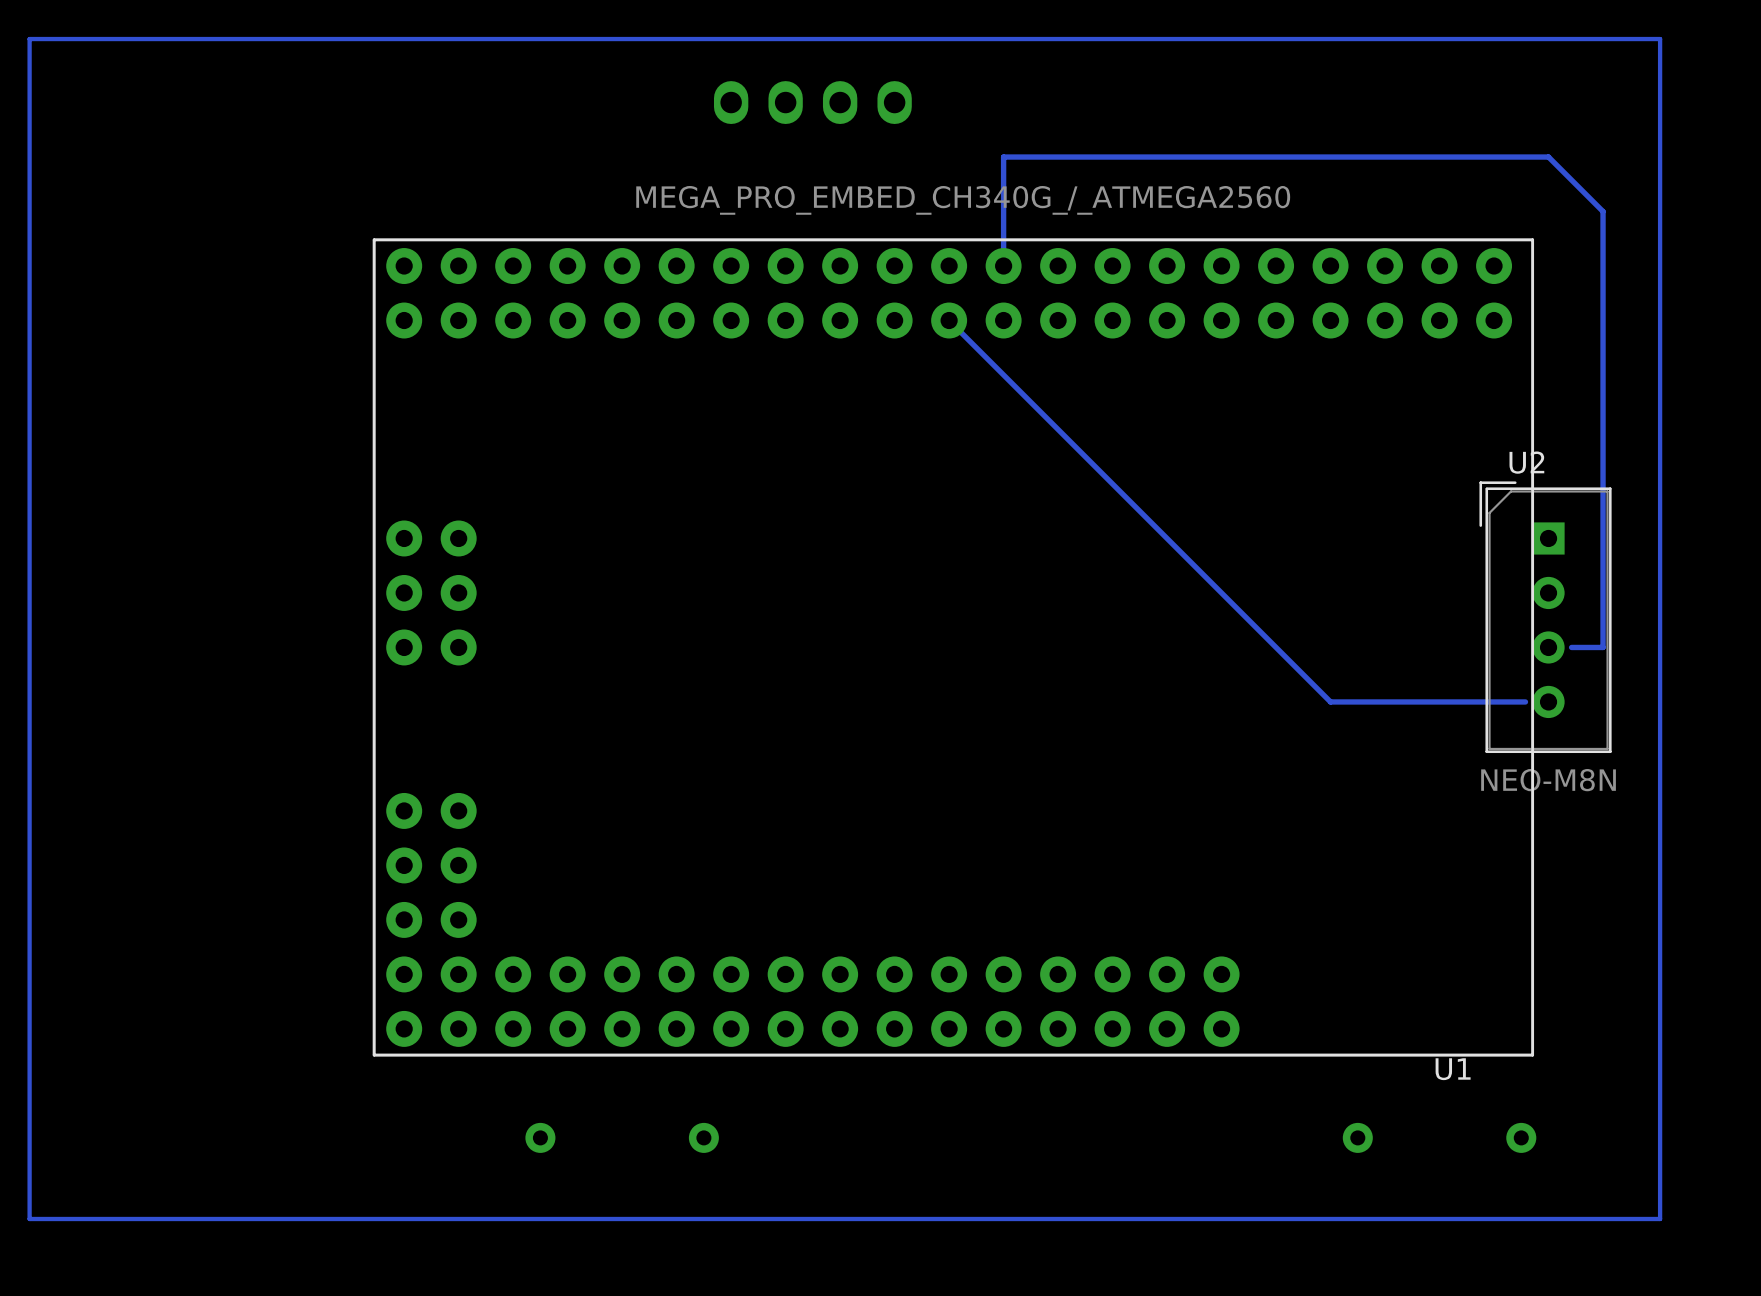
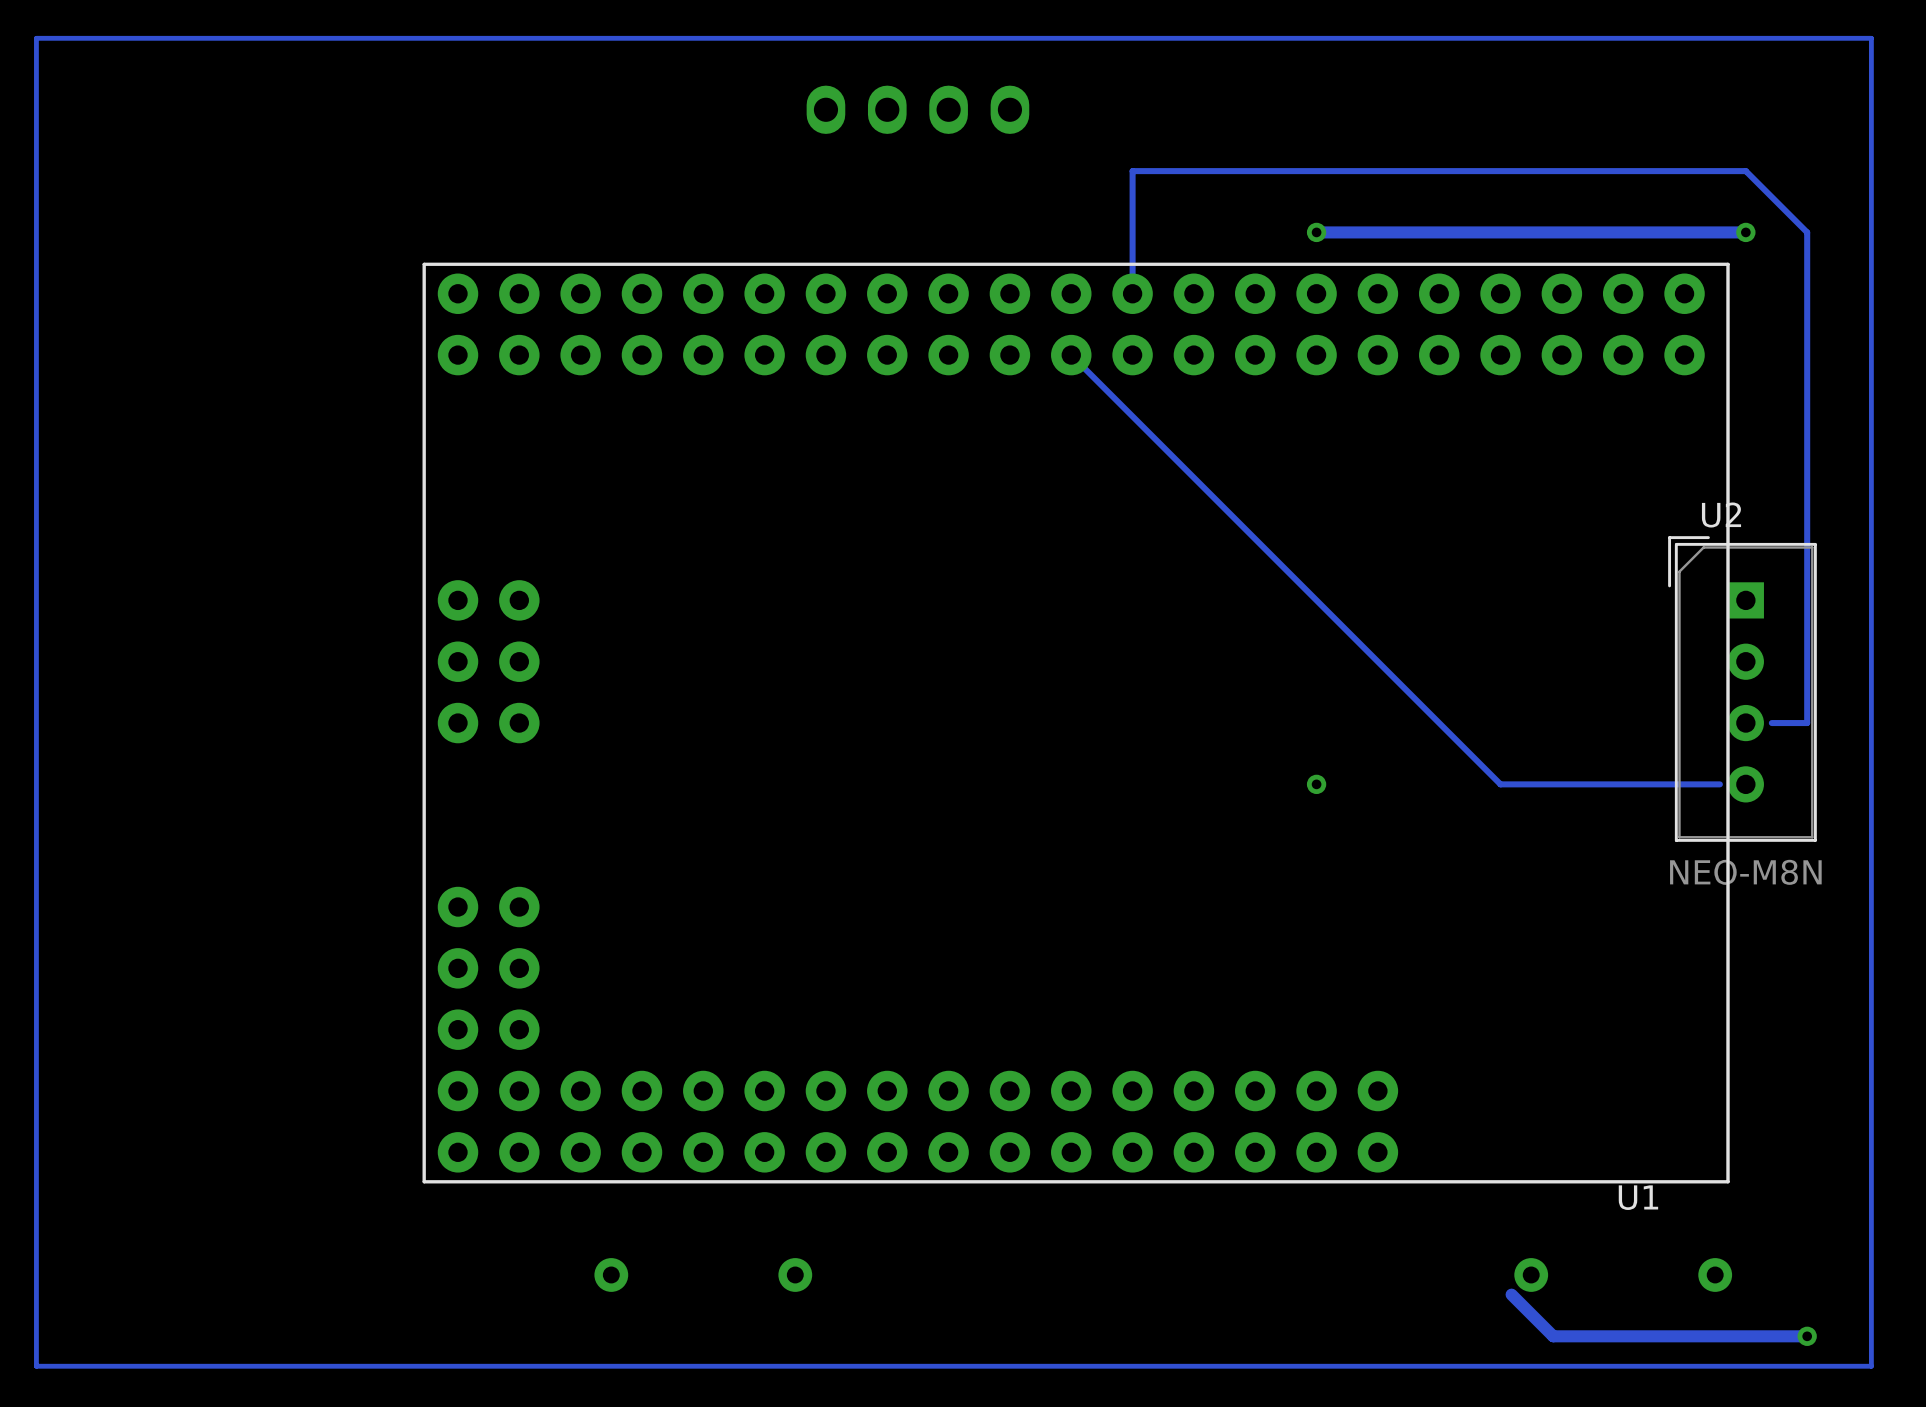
U1 value: MEGA_PRO_EMBED_CH340G_/_ATMEGA2560 (963, 200) -> none
via: none -> (1316, 232)
track: none -> (1745, 232) (1316, 232)
via: none -> (1745, 232)
via: none -> (1316, 784)
track: none -> (1511, 1294) (1553, 1336) (1807, 1336)
via: none -> (1807, 1336)

